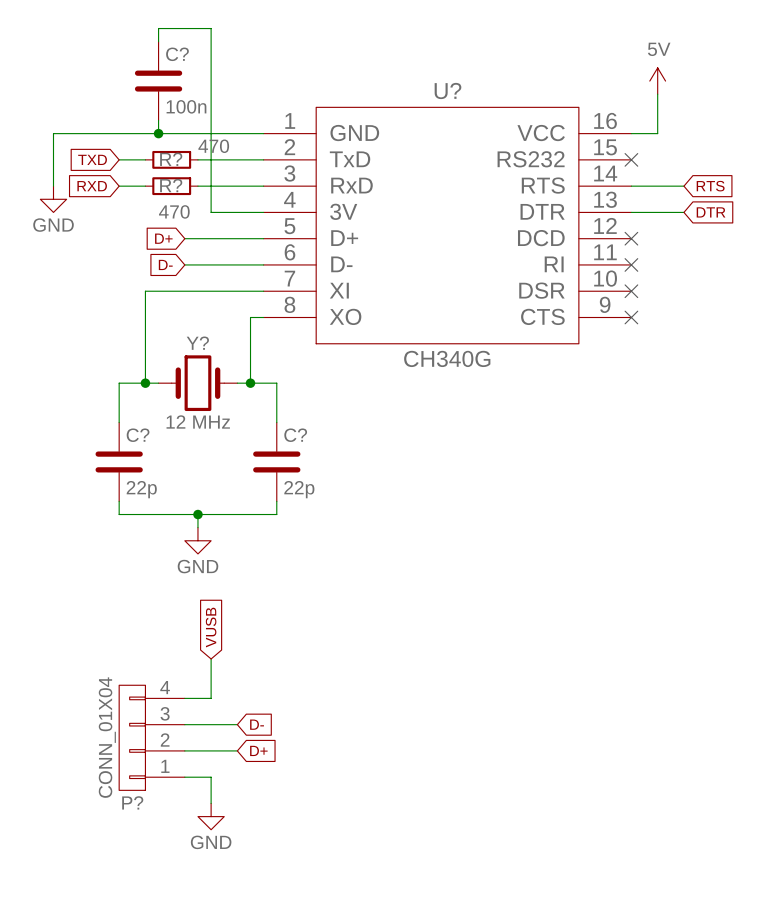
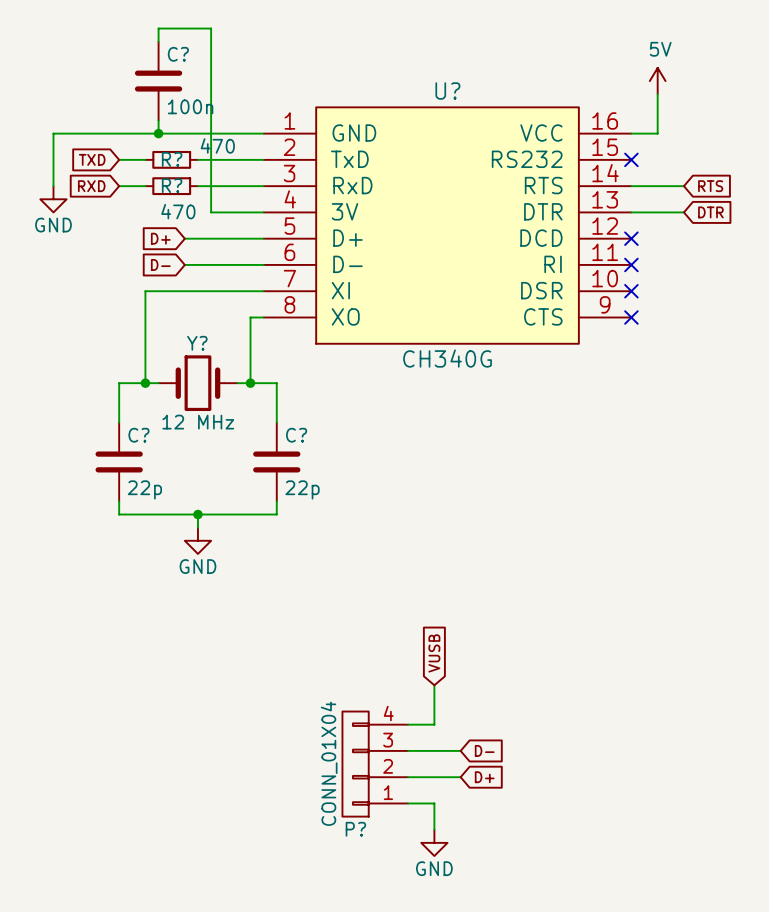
global label position: VUSB (211, 627) -> VUSB (434, 653)
wire: (211, 658) (211, 698) (184, 698) -> (434, 685) (434, 724) (408, 724)
wire: (184, 724) (237, 724) -> (408, 750) (460, 750)
global label position: D- (257, 724) -> D- (484, 750)
P? position: (152, 737) -> (375, 764)
wire: (184, 750) (237, 750) -> (408, 777) (460, 777)
global label position: D+ (258, 750) -> D+ (484, 777)
wire: (184, 777) (211, 777) (211, 803) -> (408, 803) (434, 803) (434, 829)
power symbol position: GND (211, 816) -> GND (434, 842)

